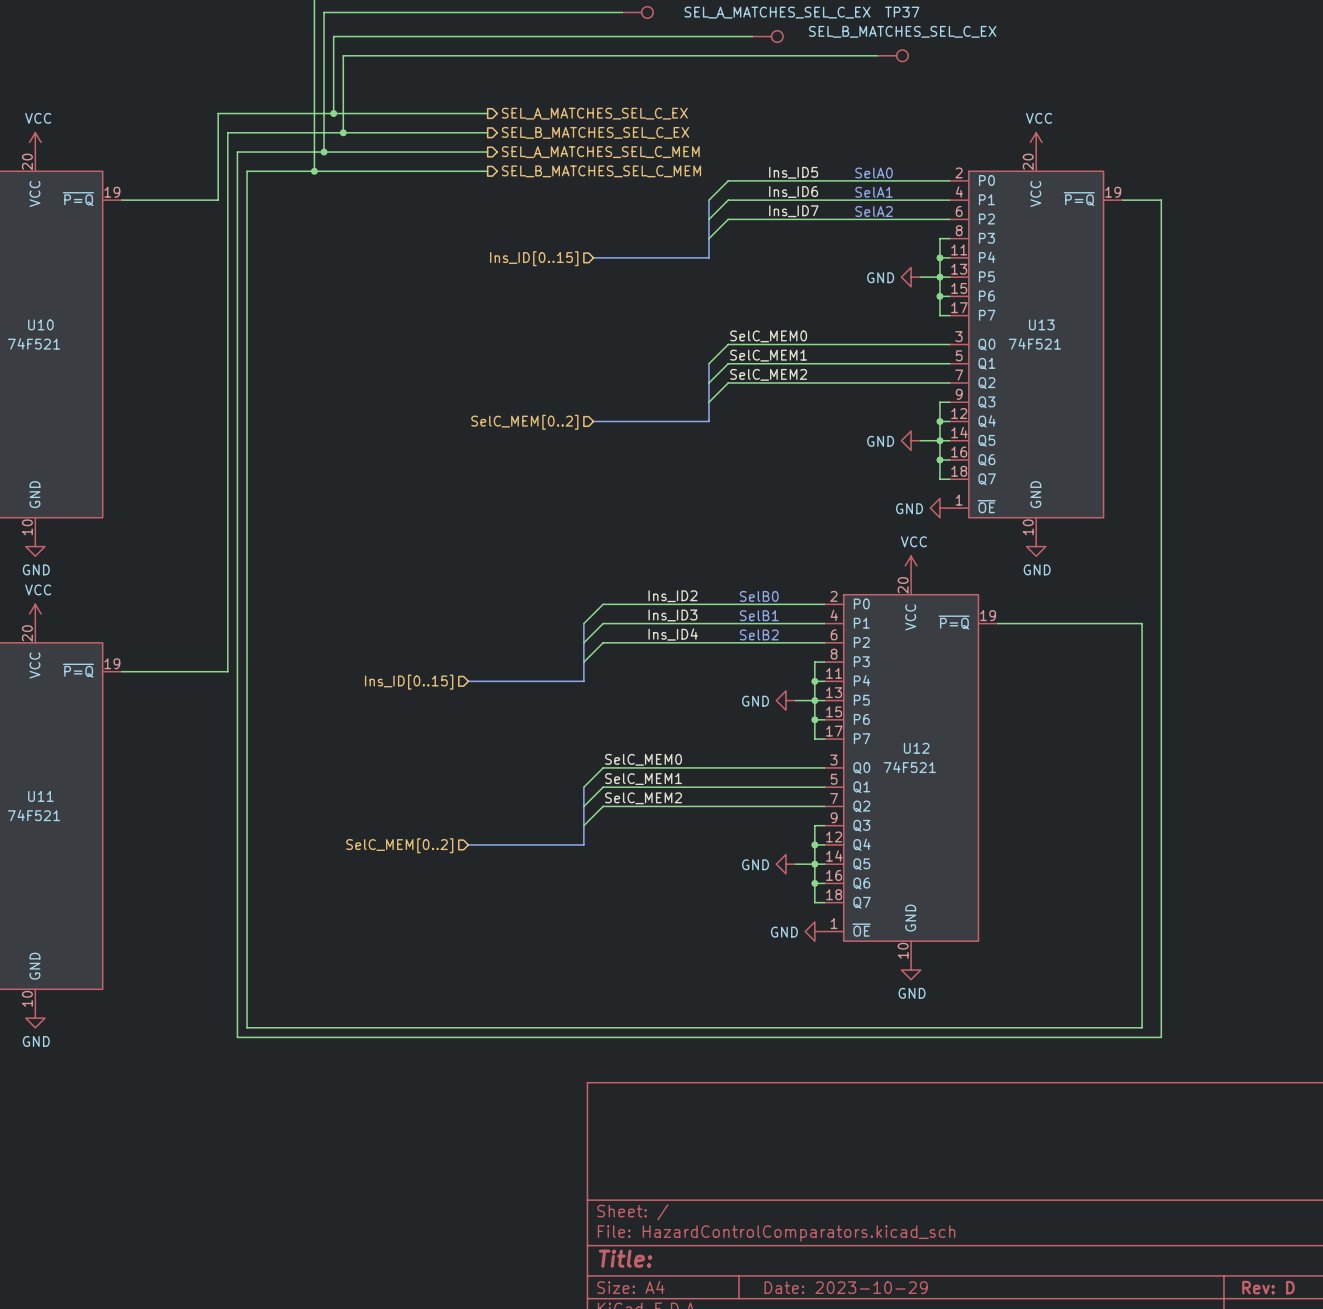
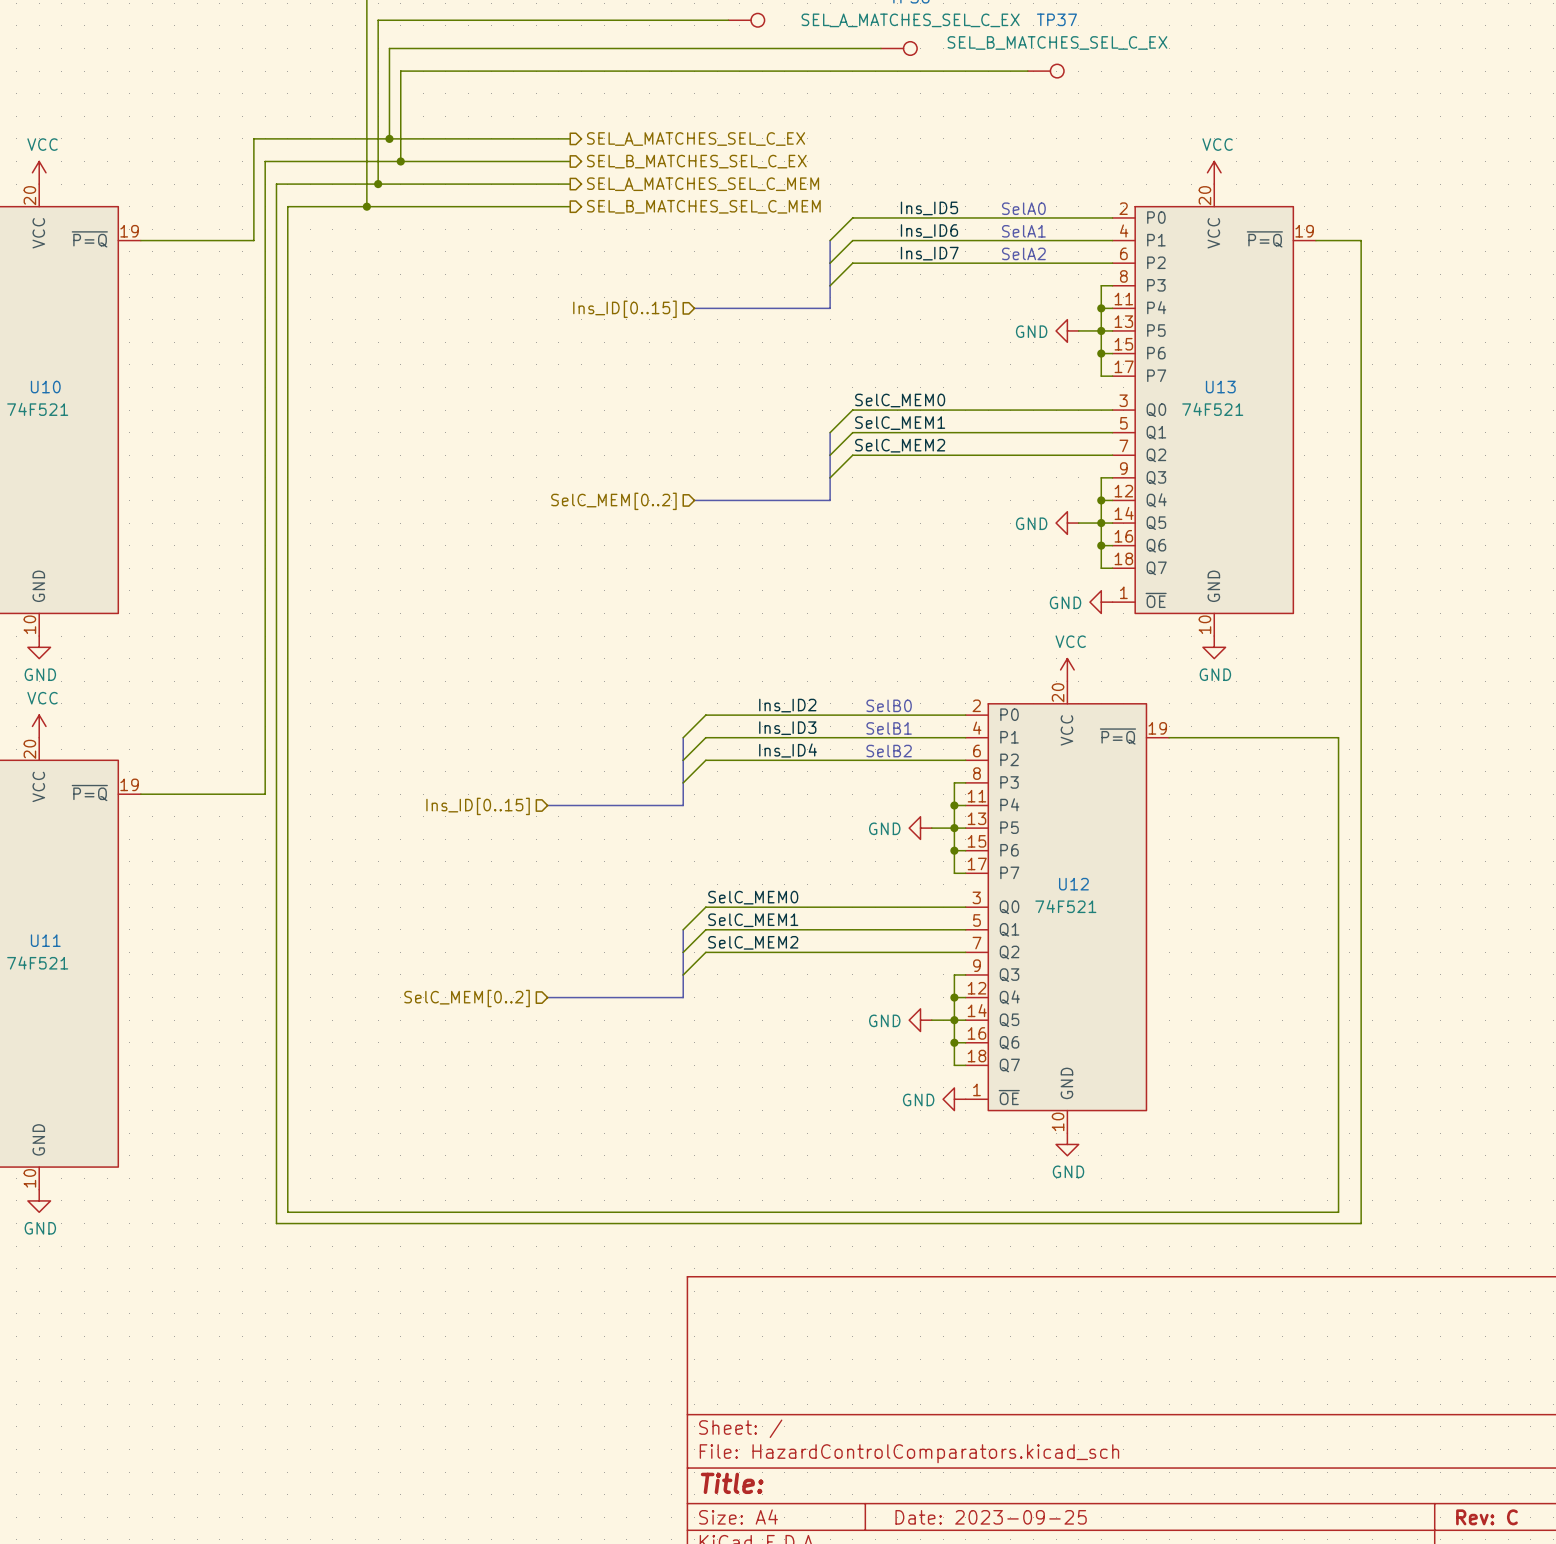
title block: Date: 2023-10-29 (846, 1287) -> Date: 2023-09-25 (991, 1517)
title block: Rev: D (1268, 1287) -> Rev: C (1486, 1517)

